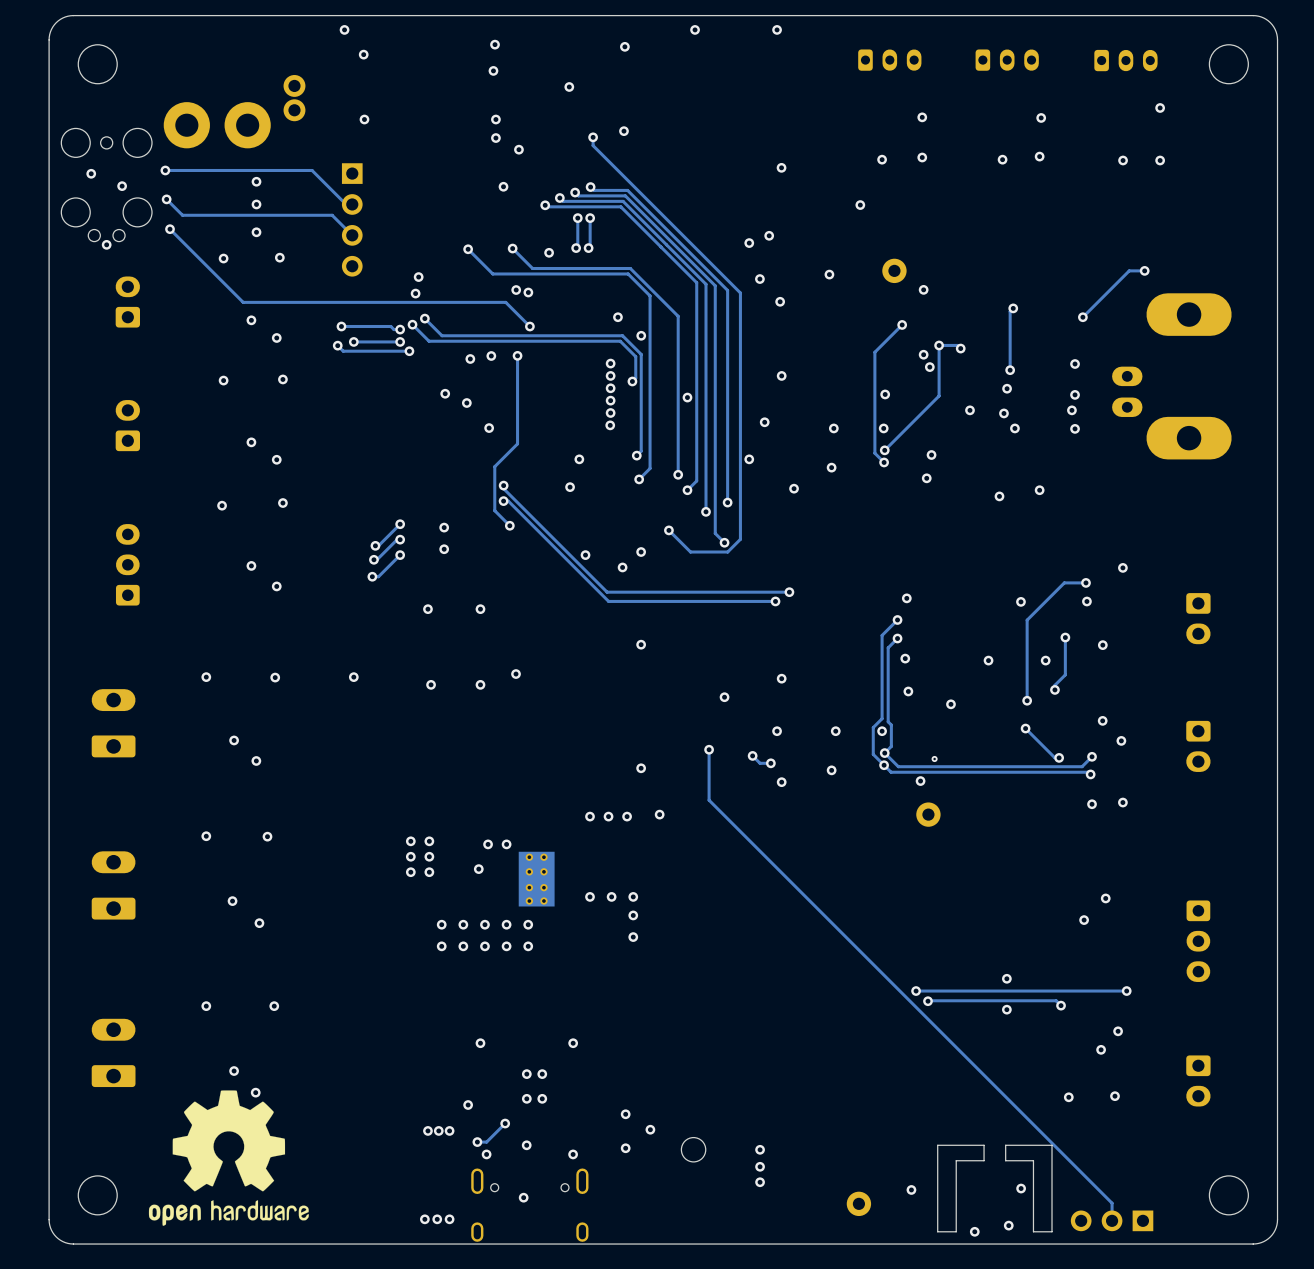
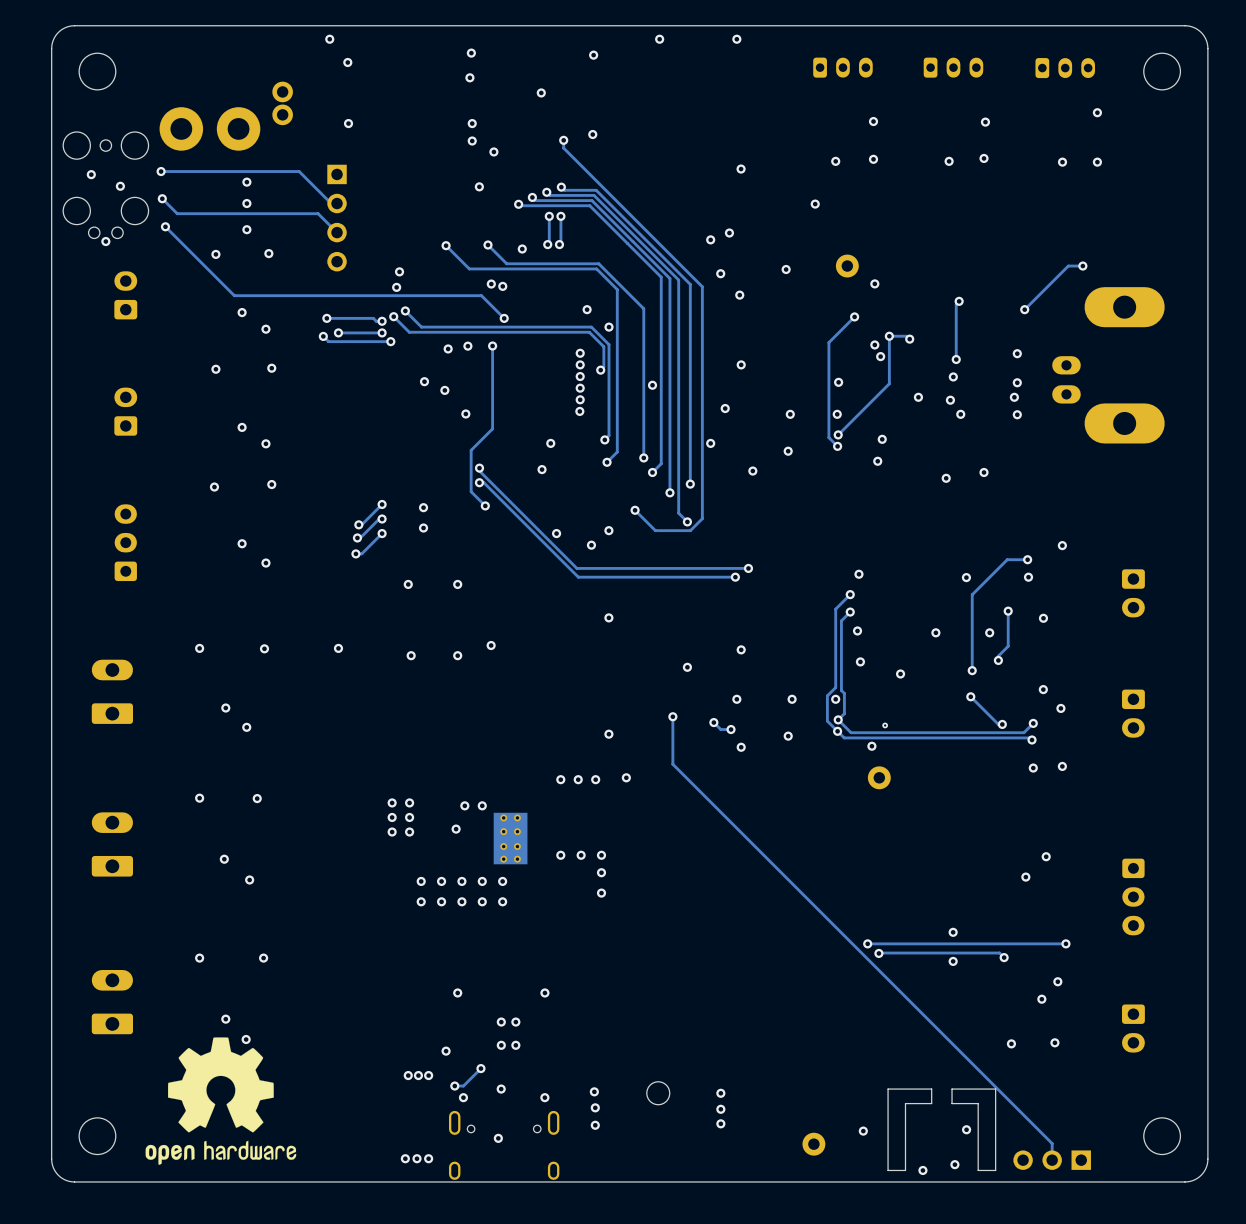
via: (625, 1114) -> none
via: (650, 1129) -> none
via: none -> (595, 1107)
via: none -> (595, 1125)

